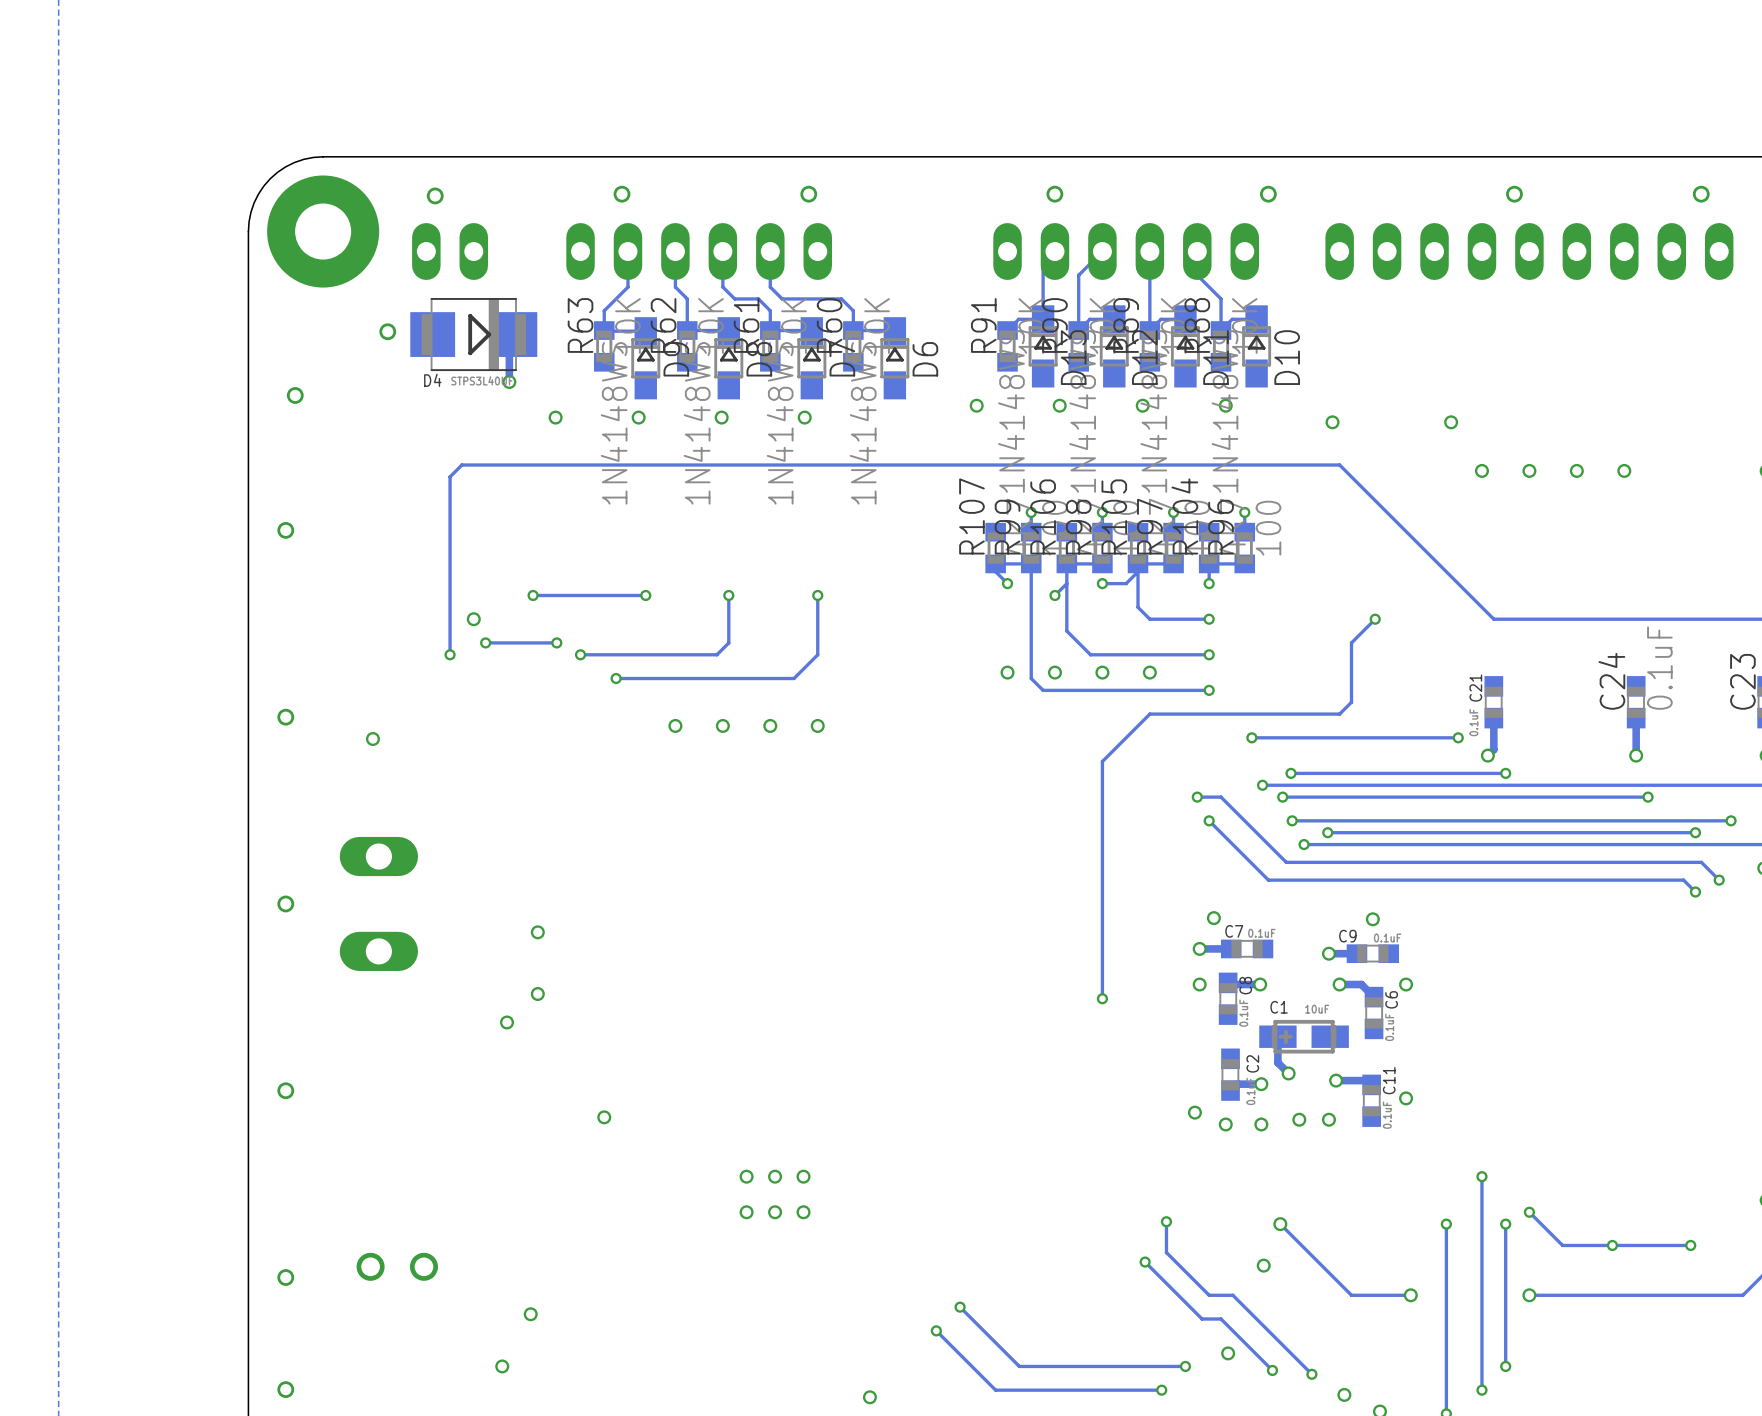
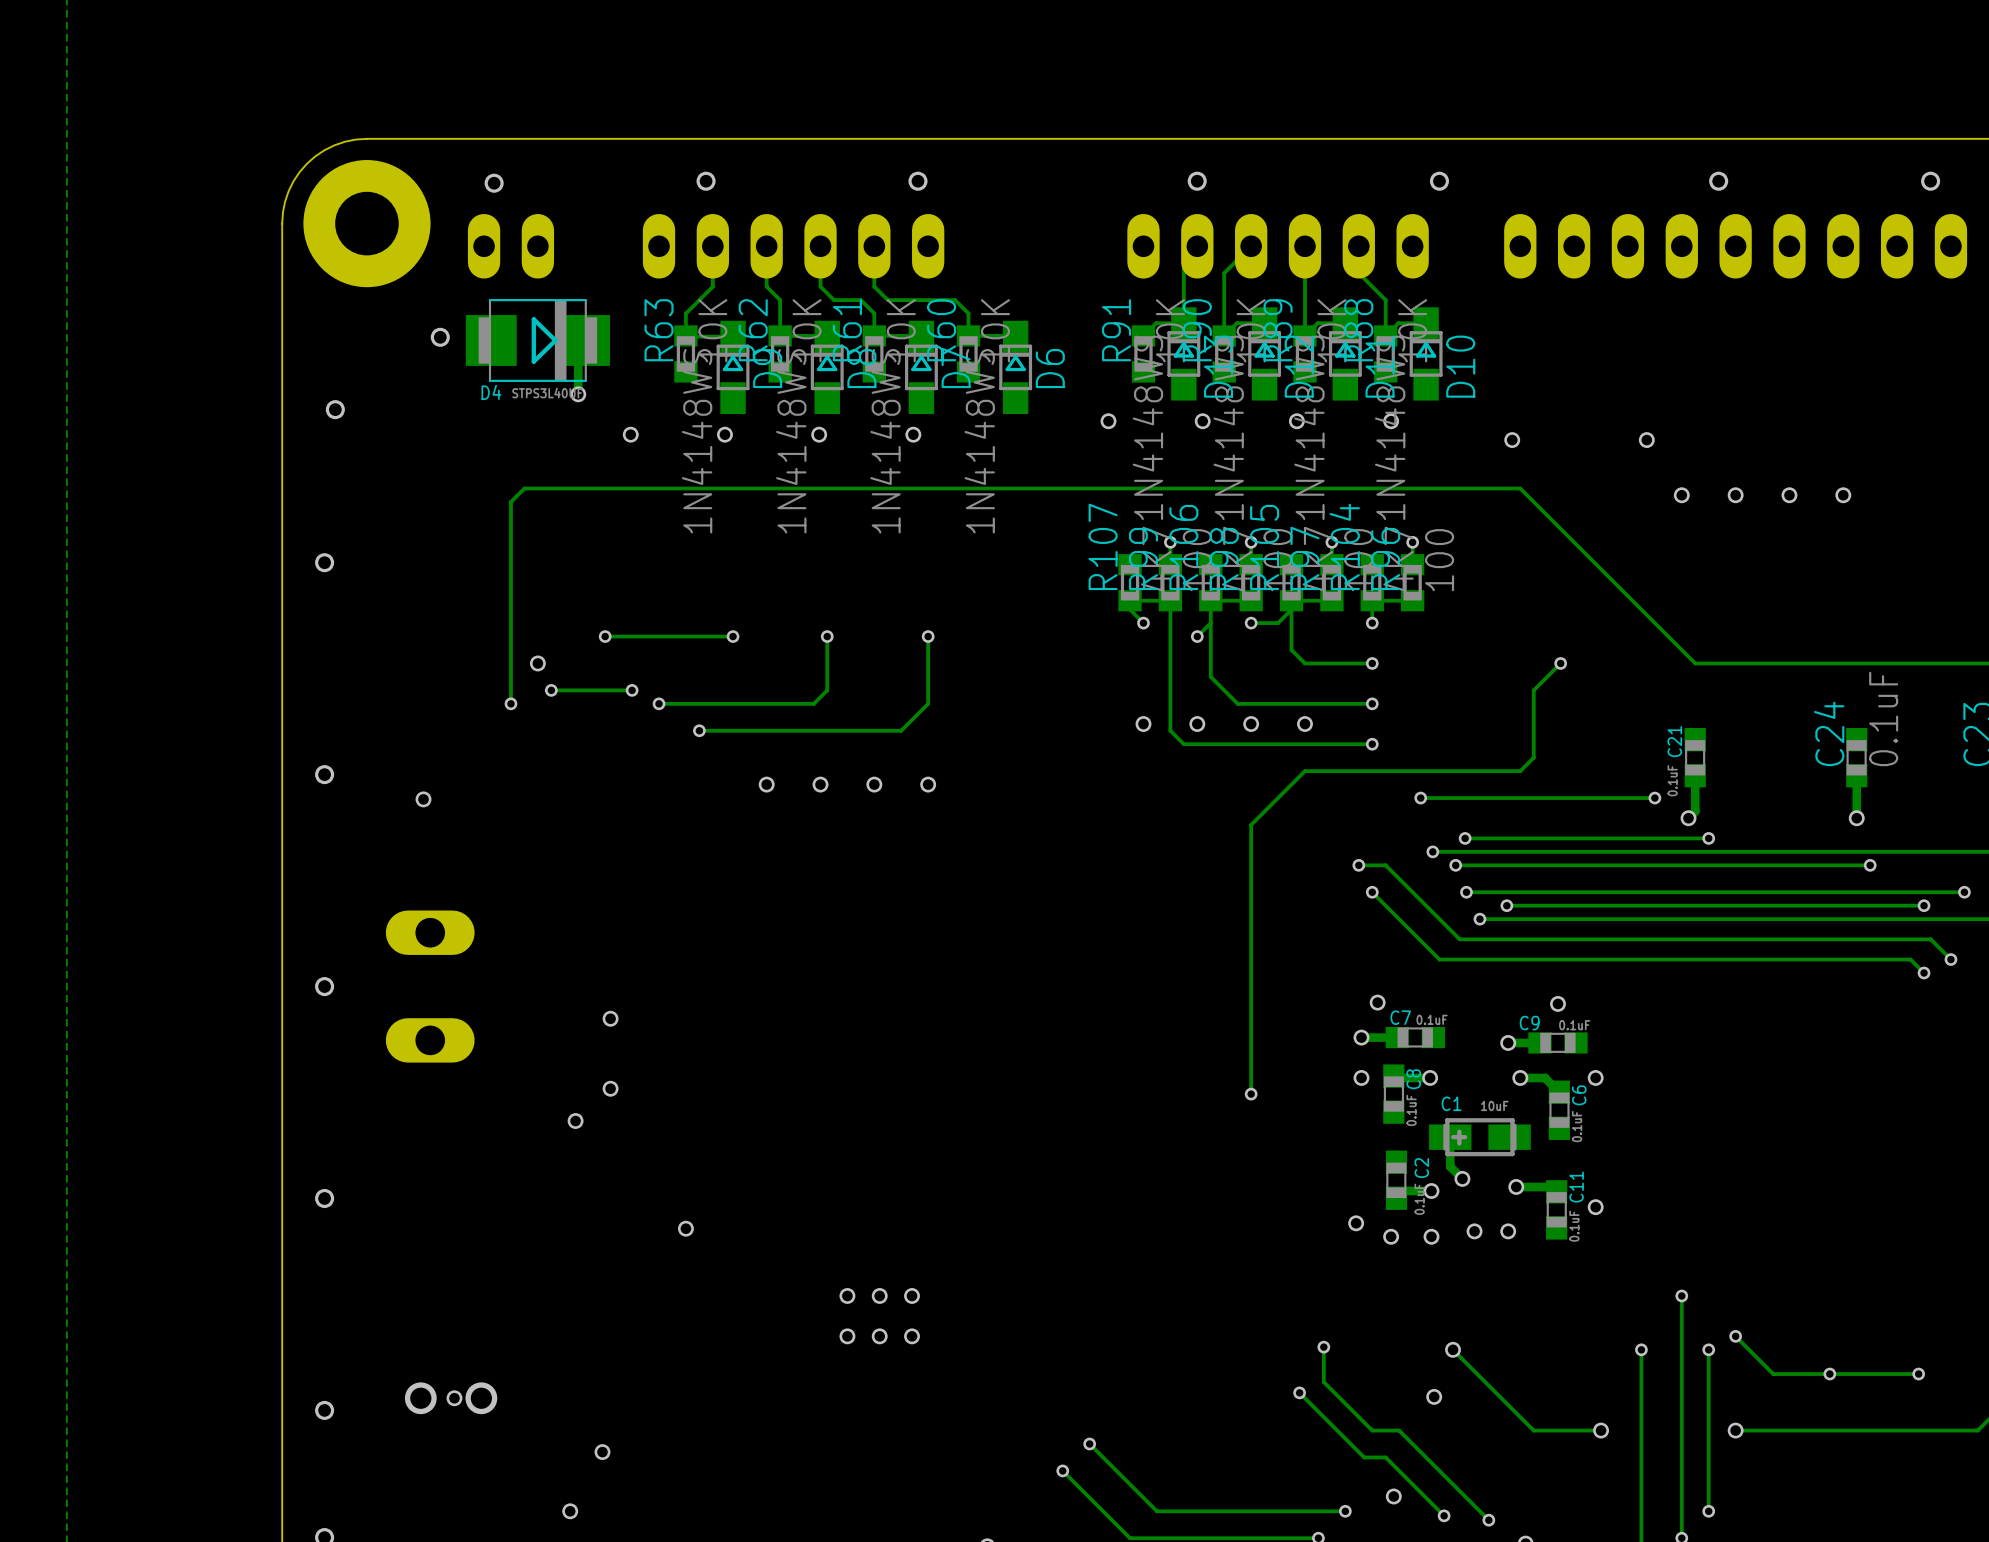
via: none -> (454, 1398)

